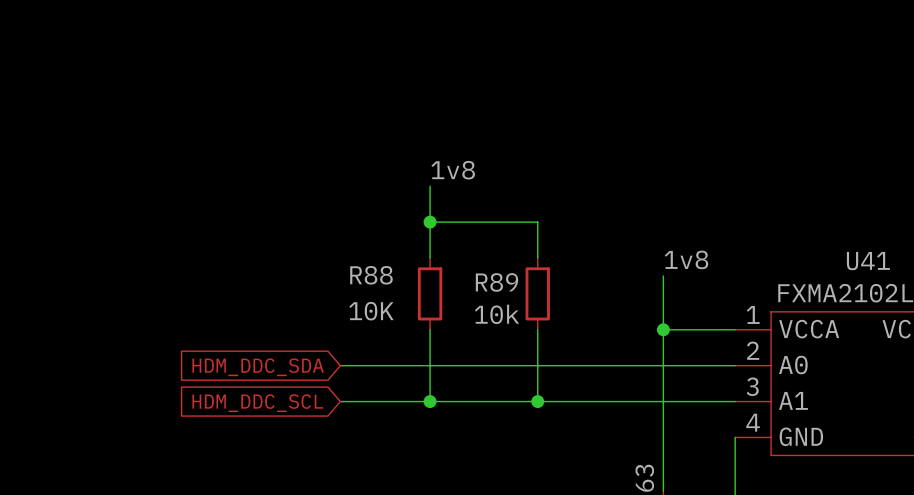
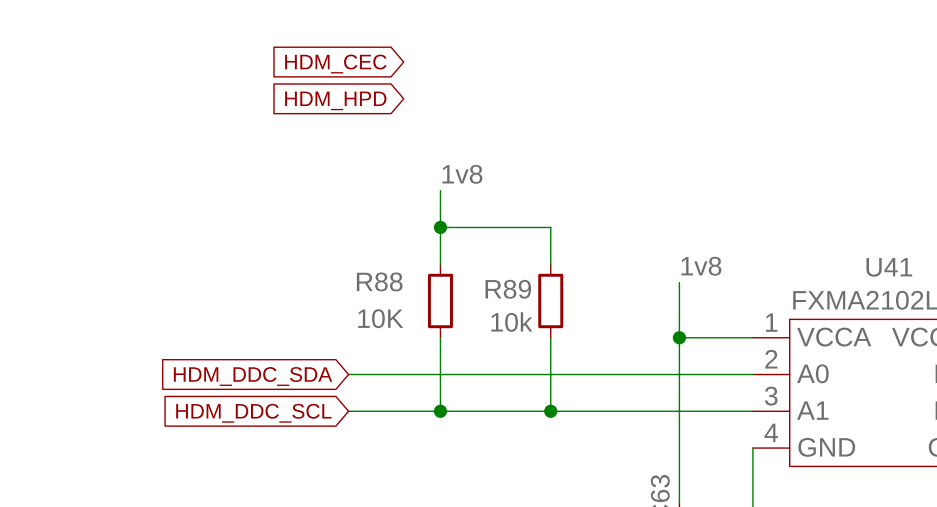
global label: none -> HDM_CEC (335, 64)
global label: none -> HDM_HPD (335, 100)

